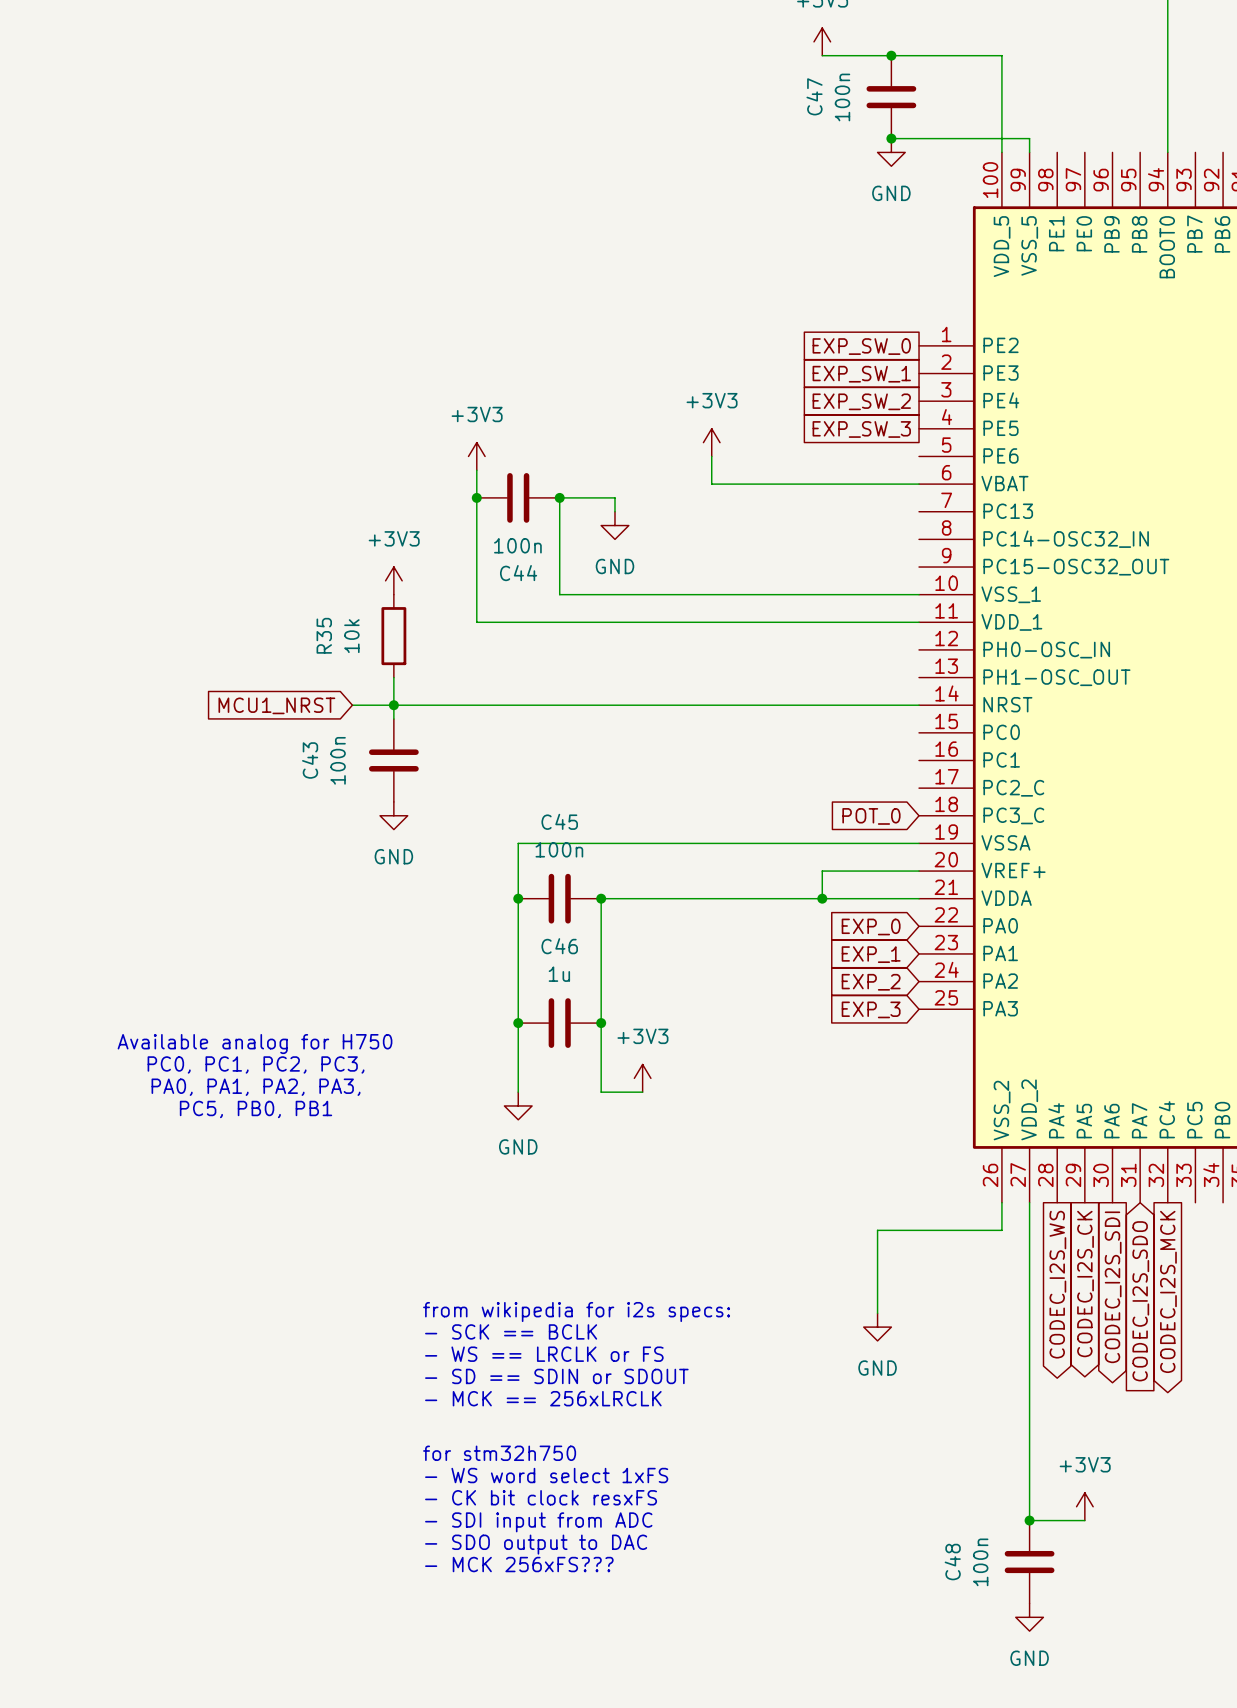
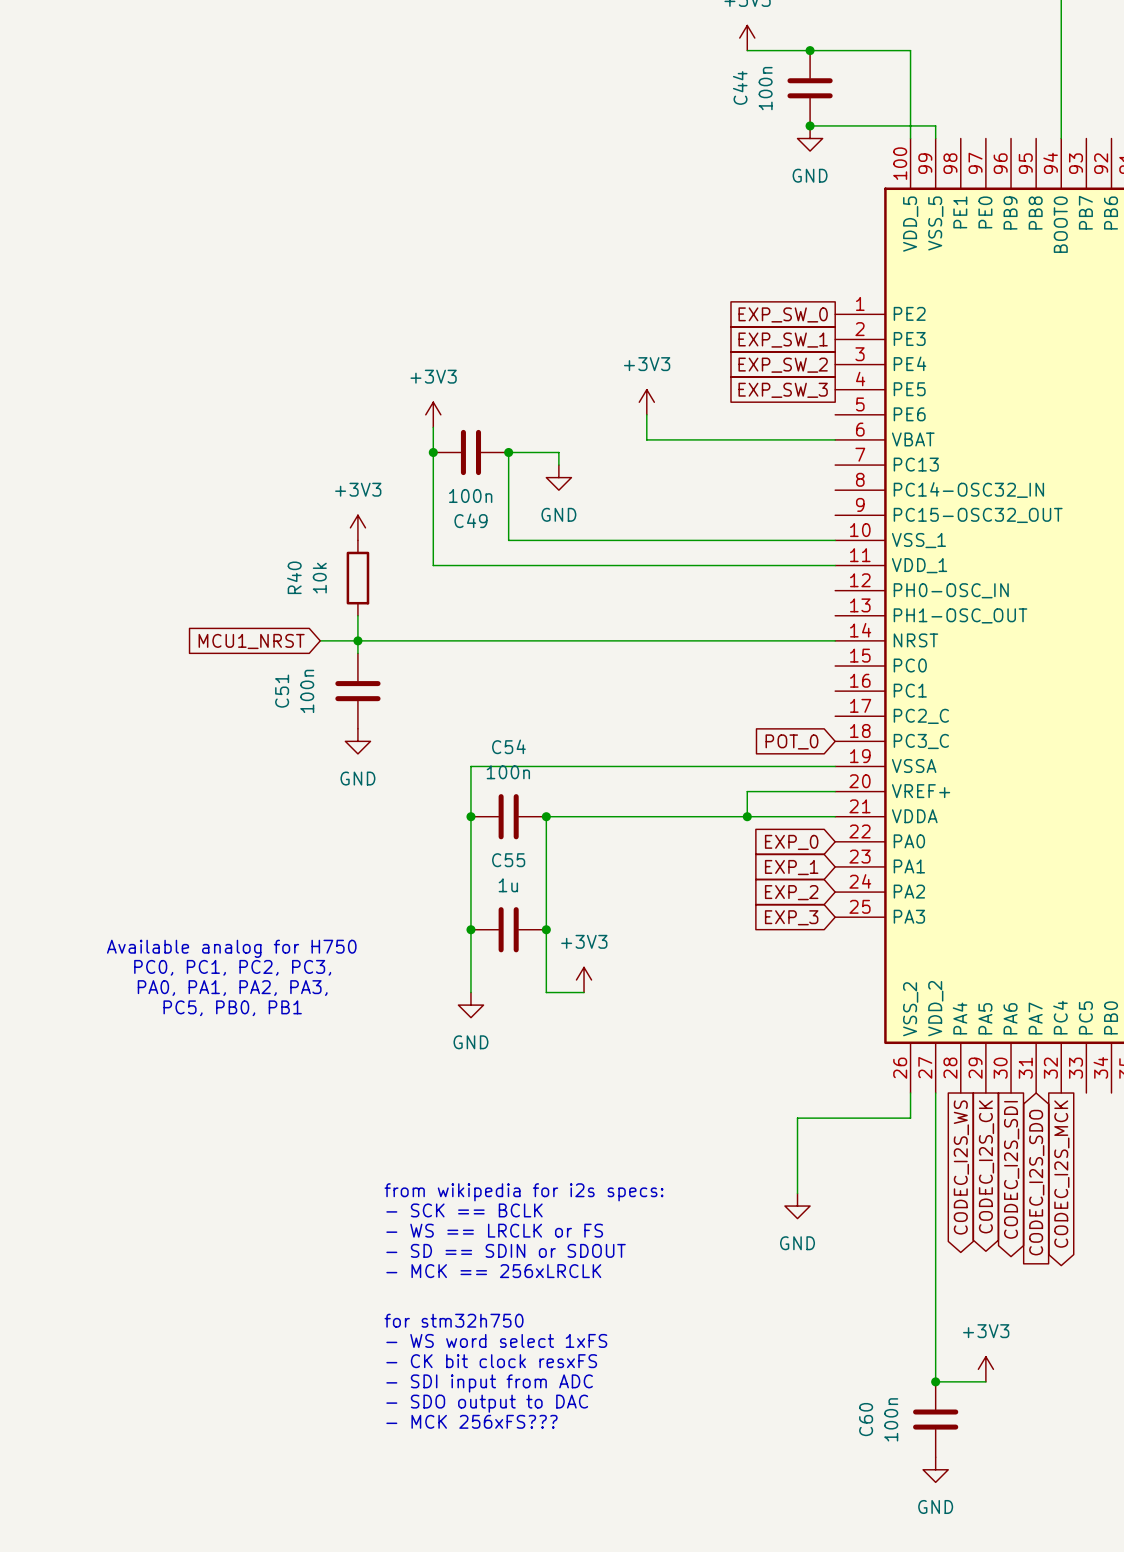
C47 name: C47 (814, 96) -> C44 (740, 87)
C44 name: C44 (518, 573) -> C49 (470, 520)
R35 name: R35 (324, 635) -> R40 (294, 577)
C43 name: C43 (310, 760) -> C51 (282, 691)
C45 name: C45 (559, 821) -> C54 (508, 746)
C46 name: C46 (559, 946) -> C55 (508, 860)
C48 name: C48 (952, 1562) -> C60 (866, 1419)

